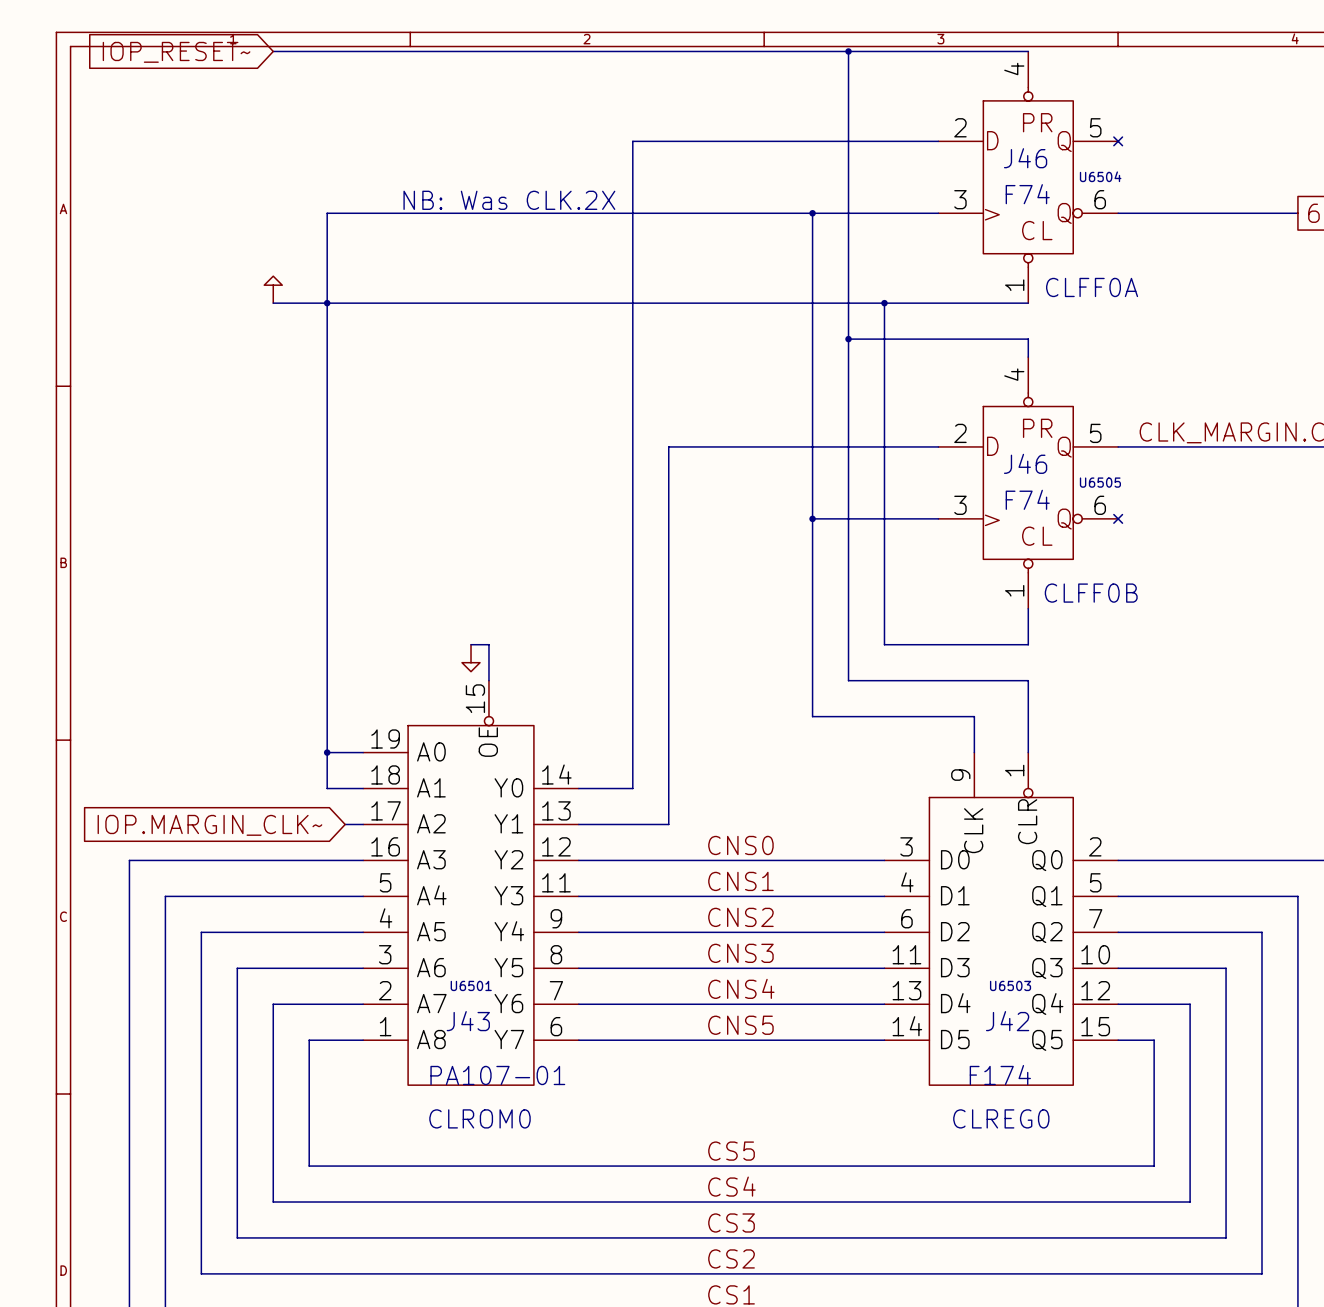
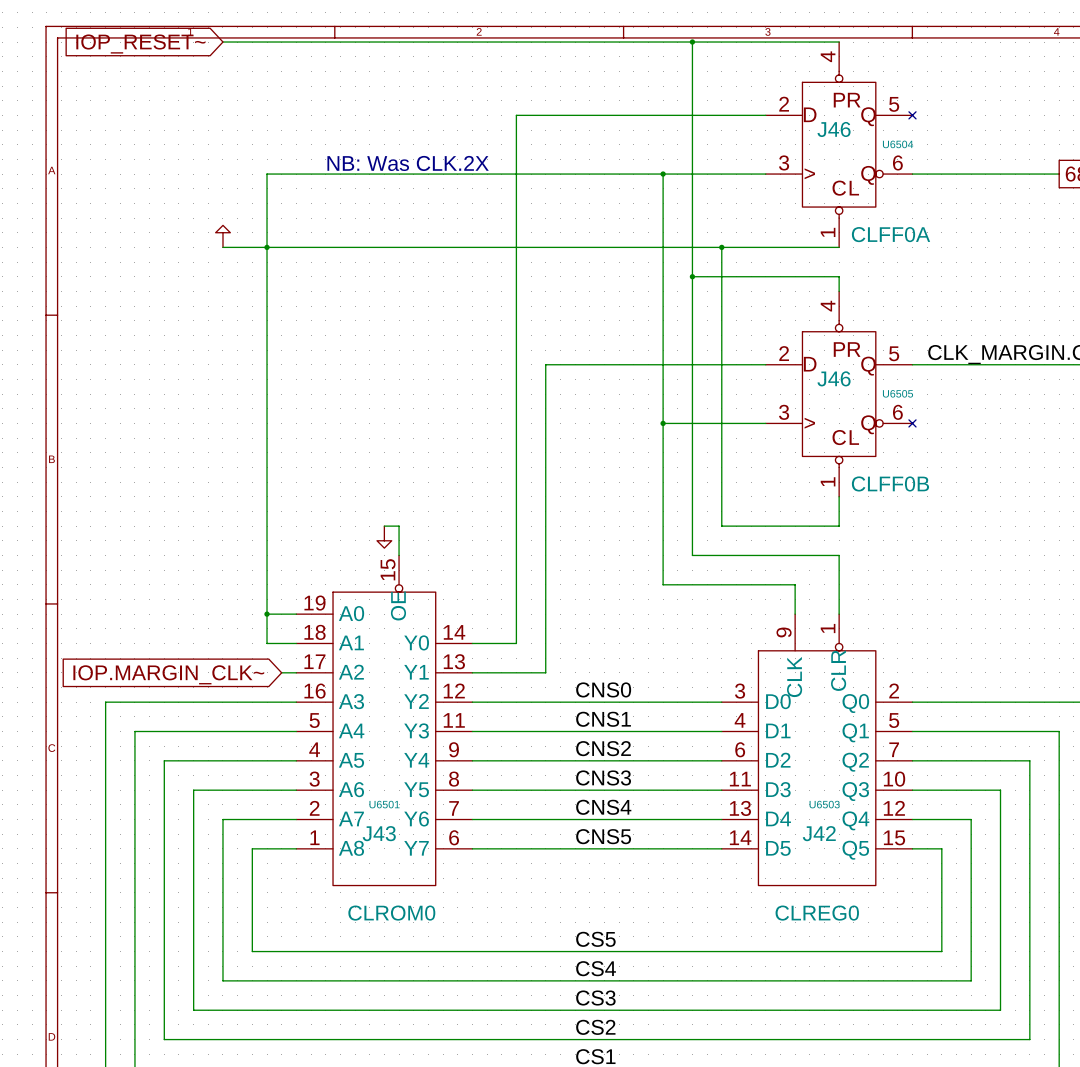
U6504 value: F74 (1027, 194) -> none
U6505 value: F74 (1027, 499) -> none
U6501 value: PA107-01 (497, 1075) -> none
U6503 value: F174 (1000, 1075) -> none

